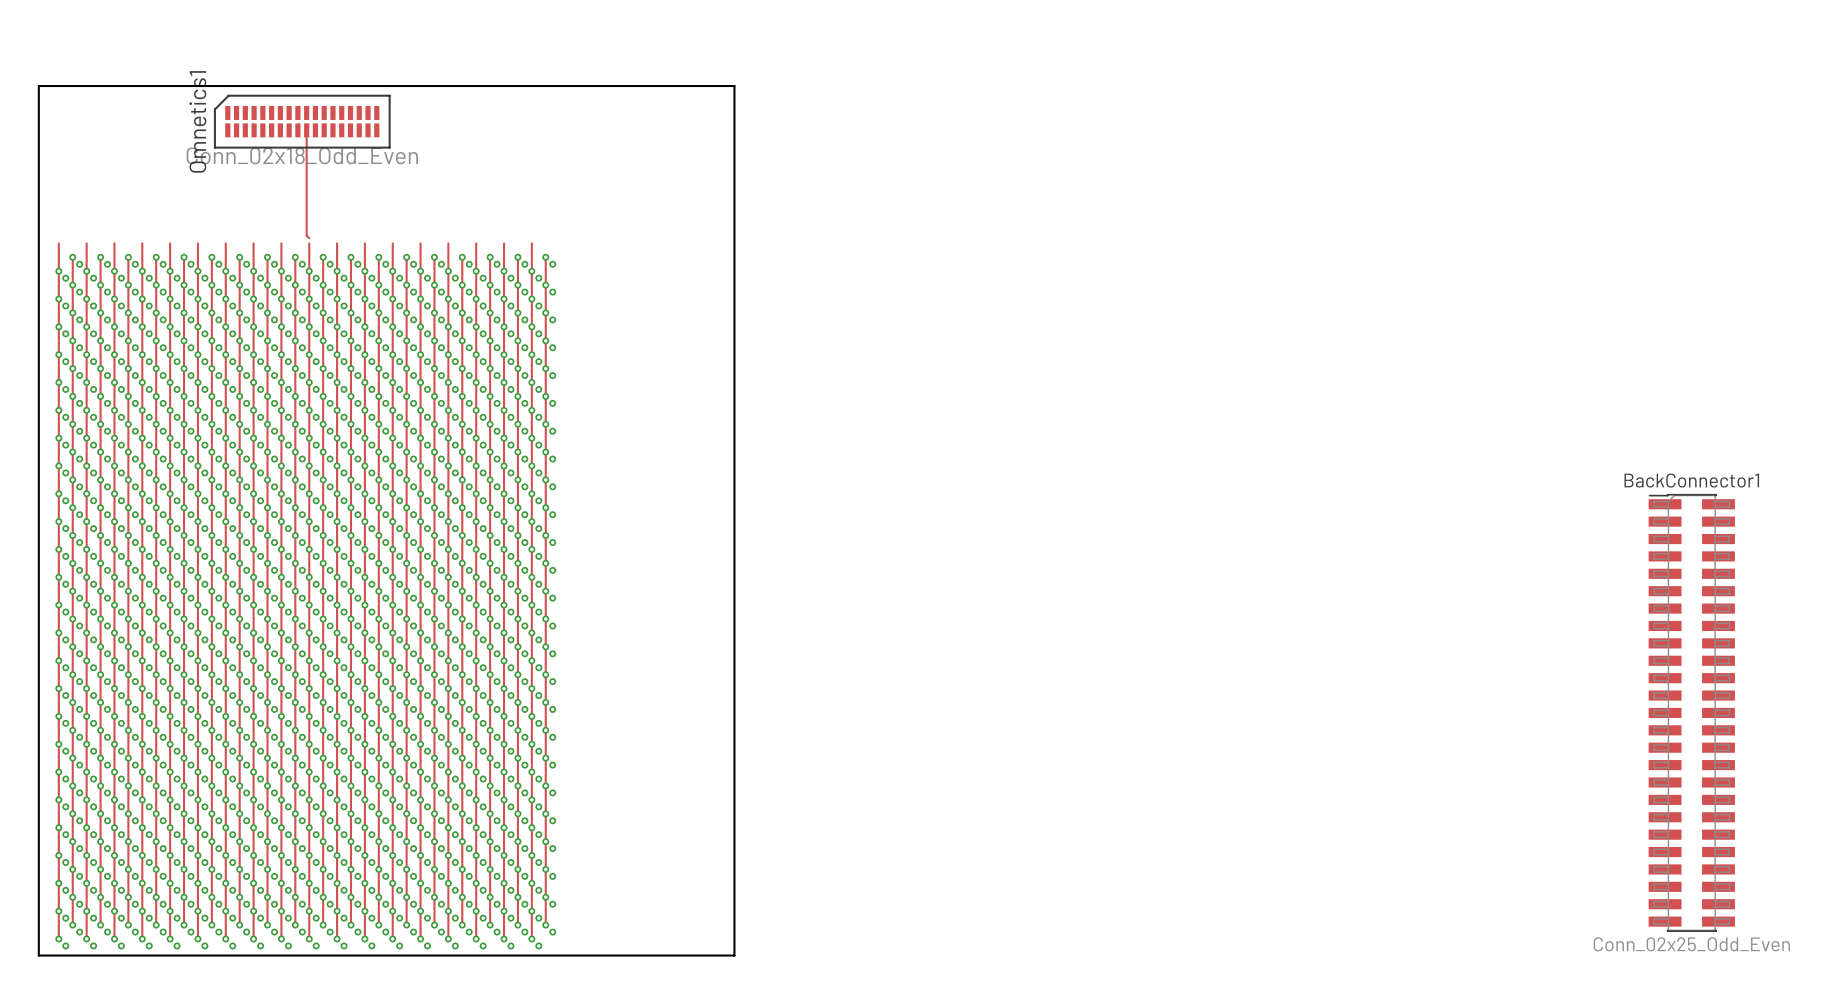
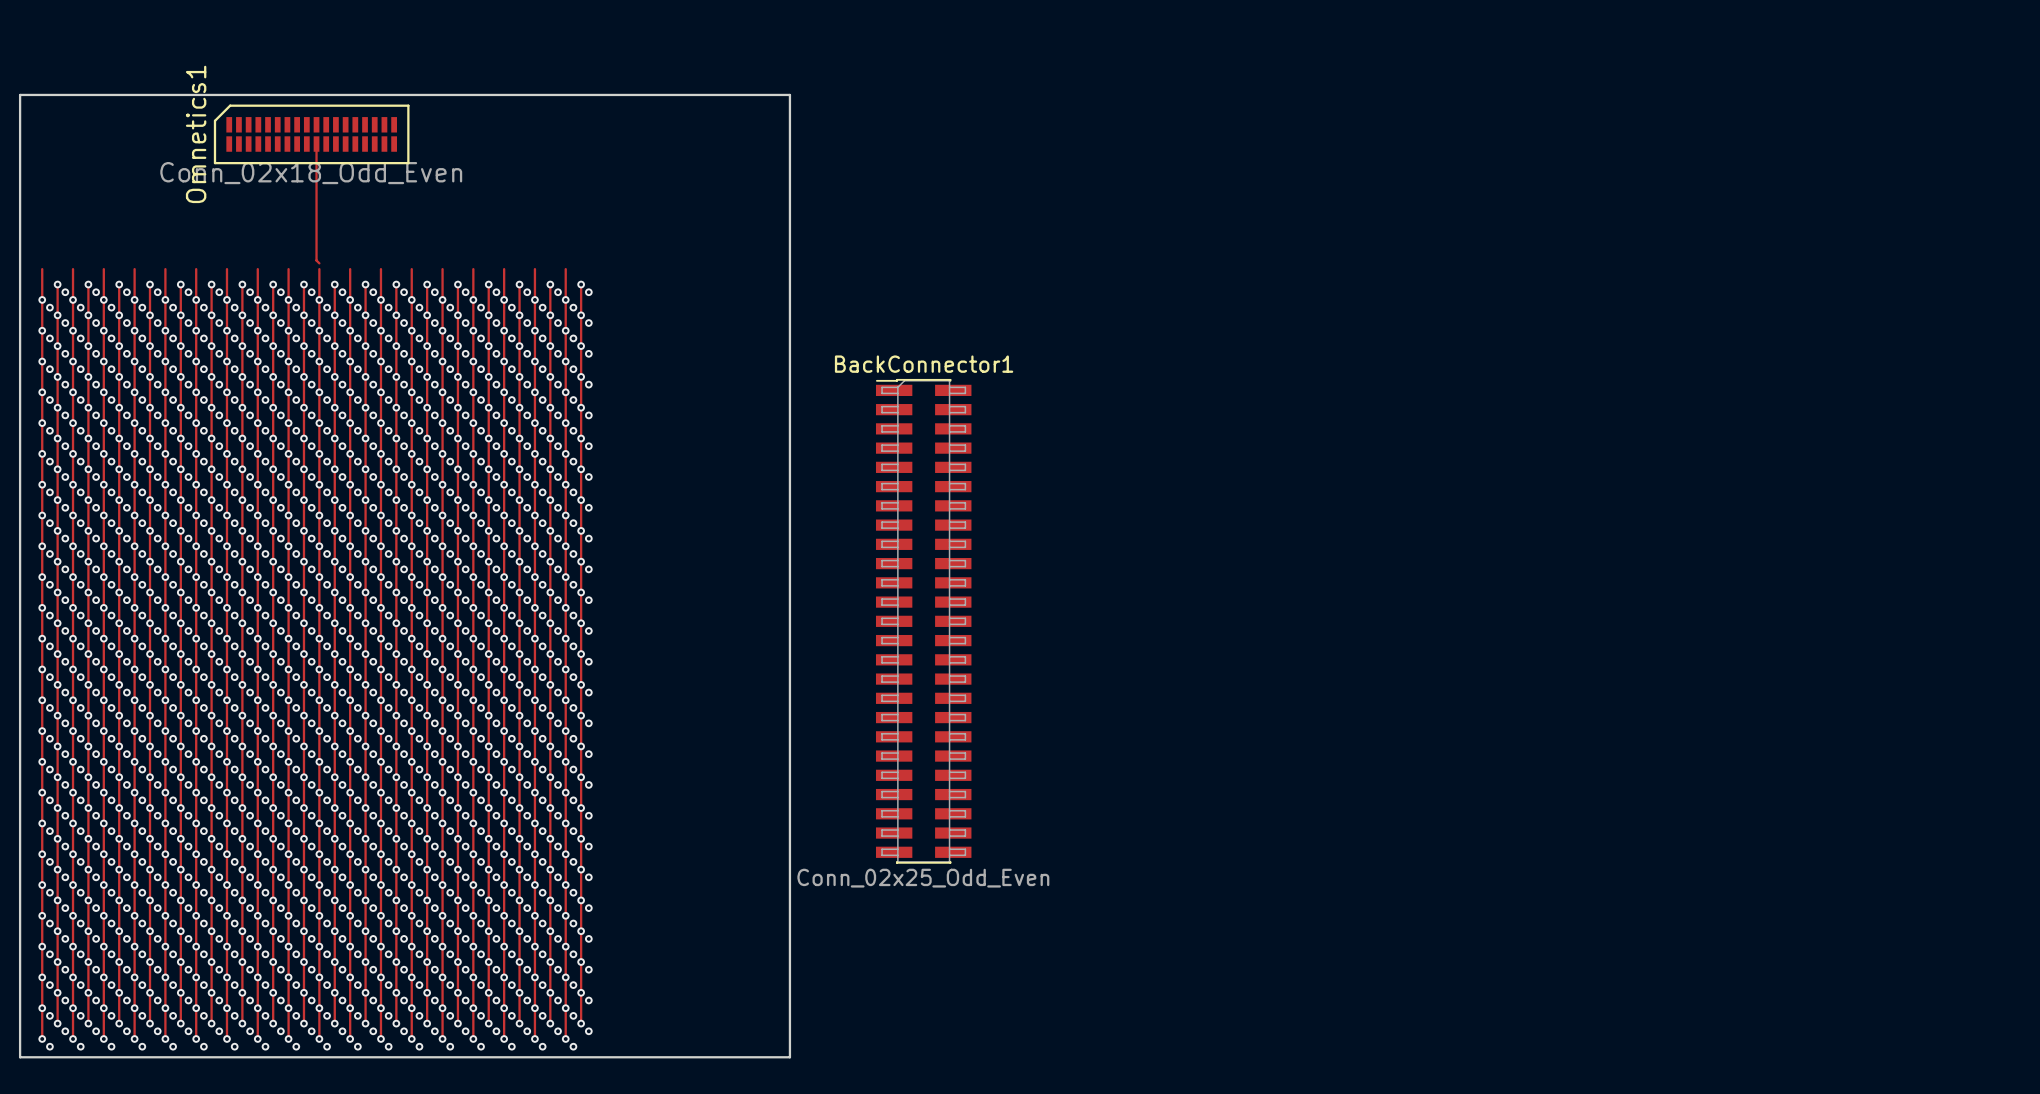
BackConnector1 position: (1691, 712) -> (923, 621)

